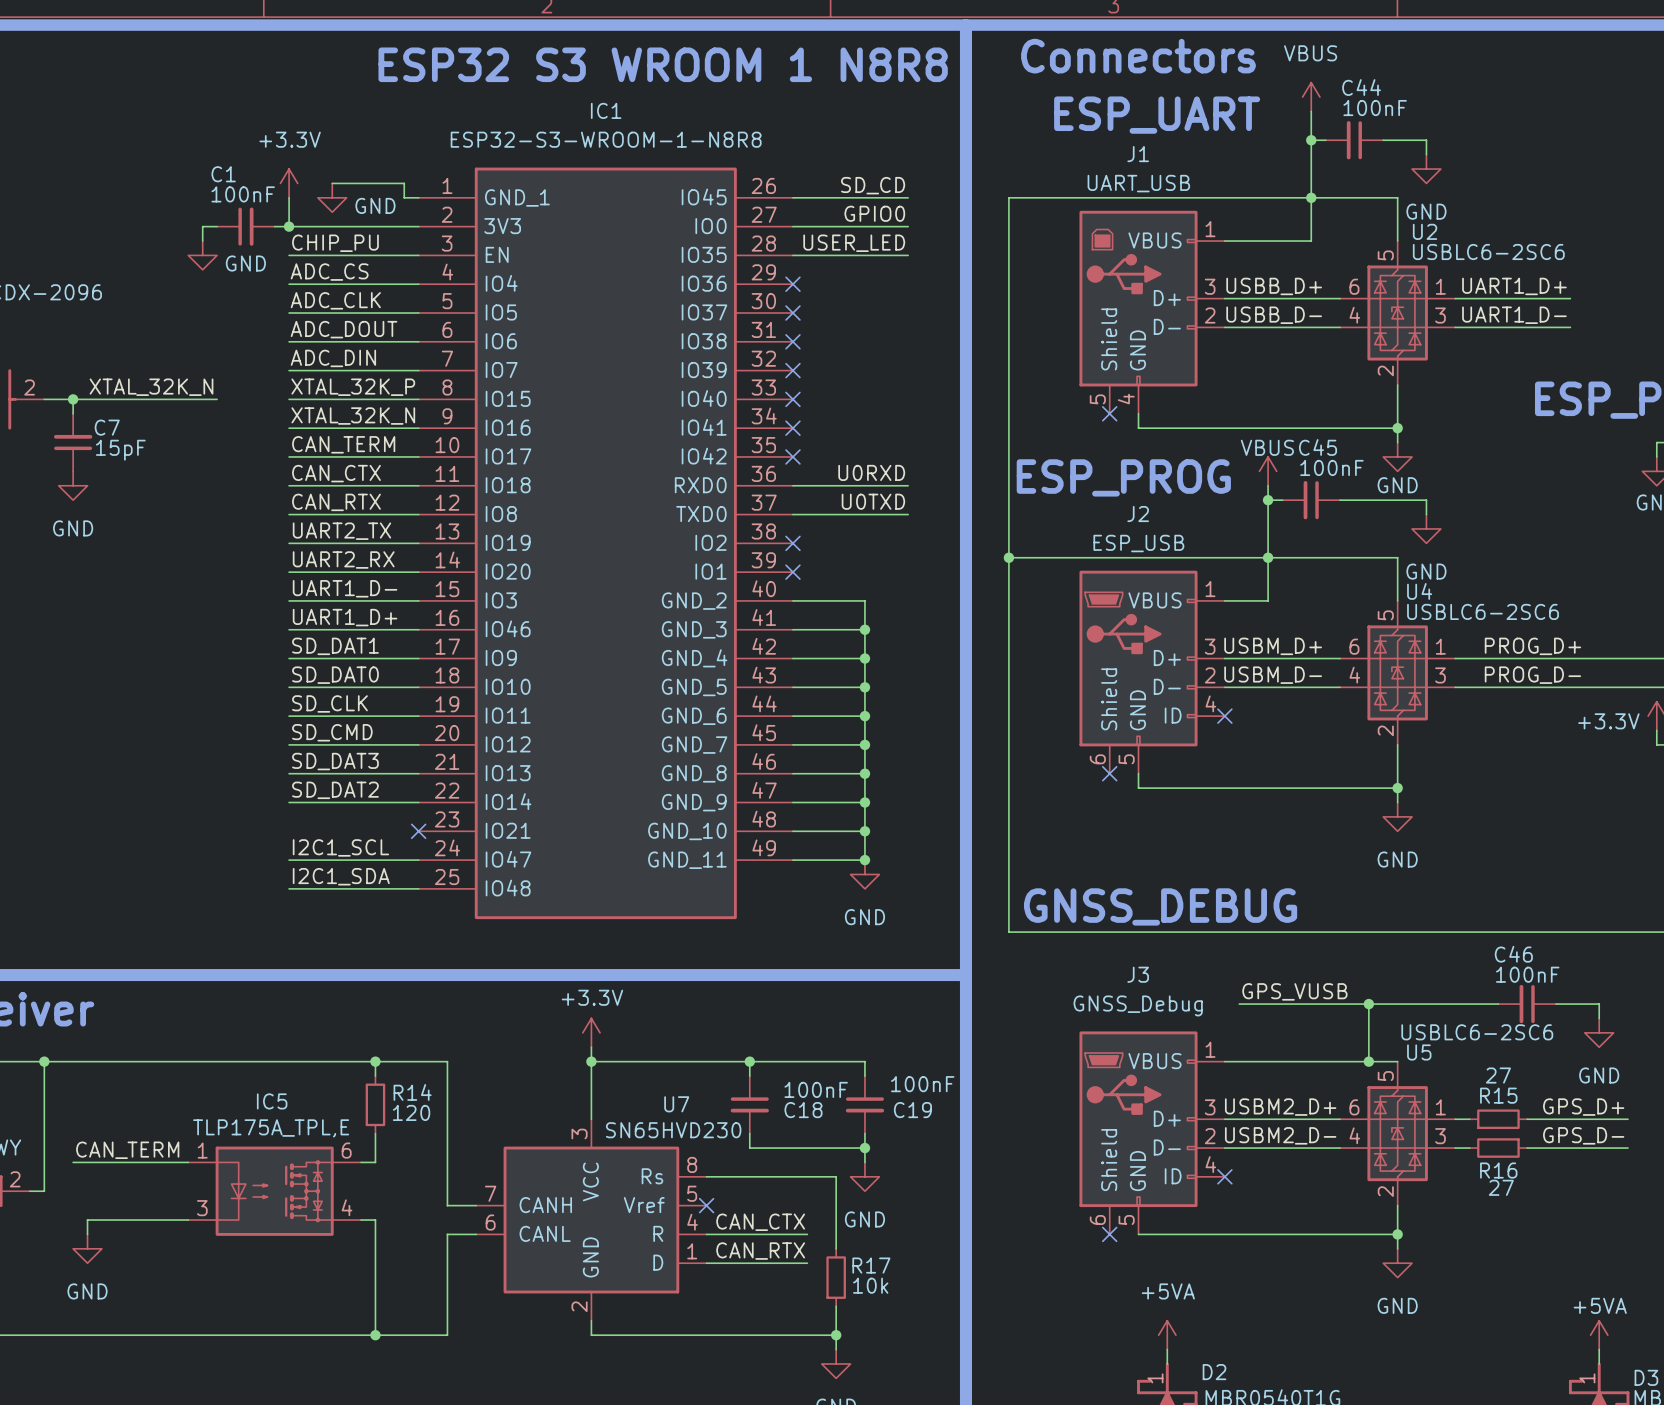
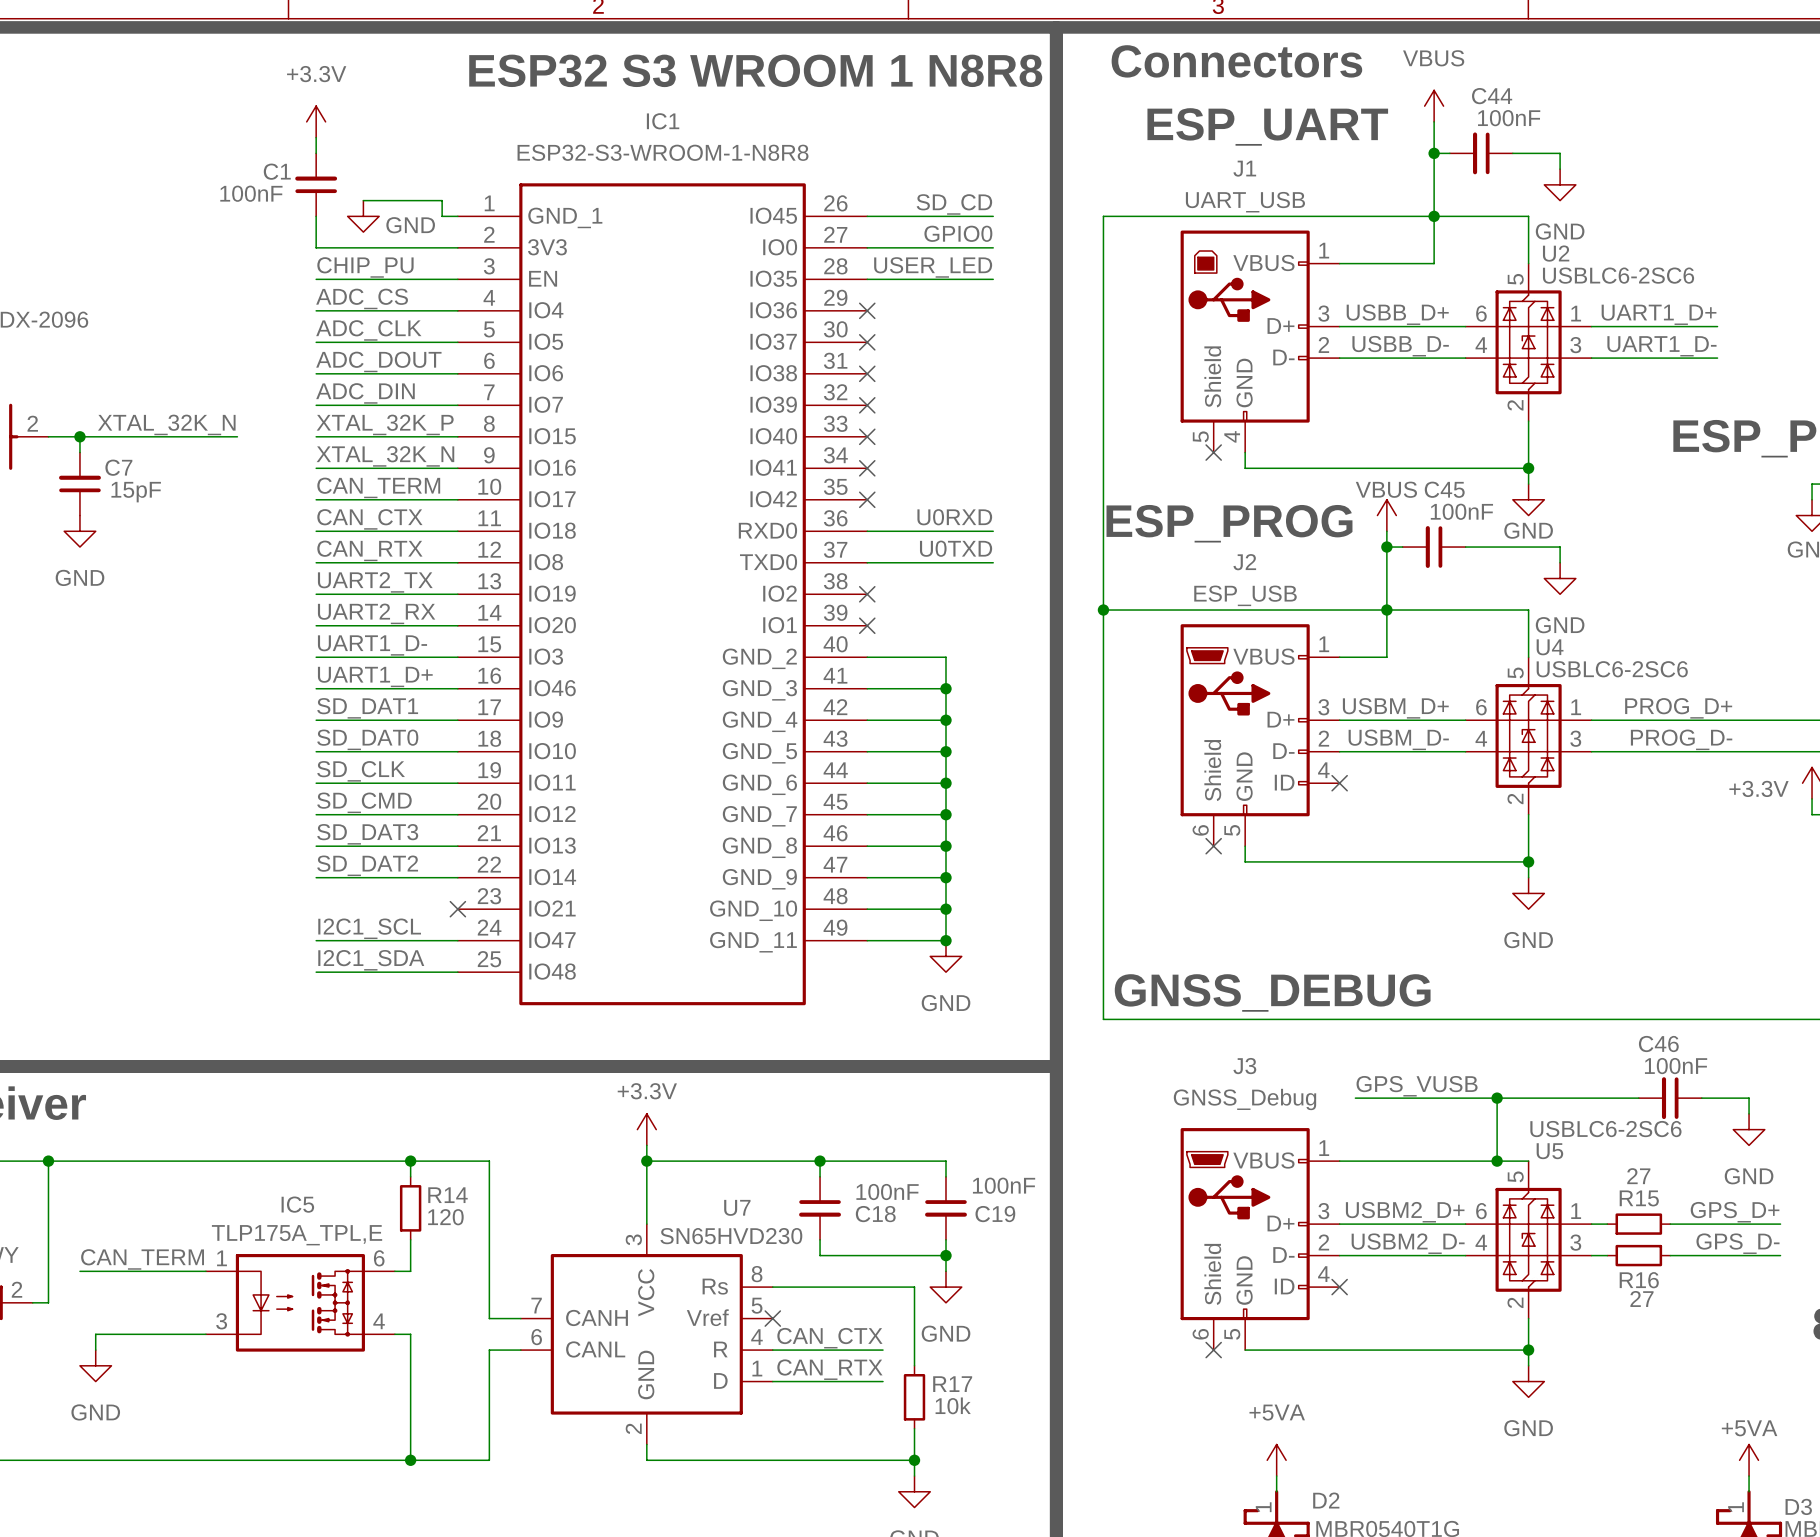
wire: none -> (316, 137) (316, 153)
C1 name position: C1 (223, 174) -> C1 (277, 171)
power symbol position: +3.3V (289, 183) -> +3.3V (316, 121)
wire: (217, 226) (202, 226) (202, 241) -> none
C1 rotation: 0° (245, 226) -> 90° counterclockwise (316, 184)
C1 position: (245, 226) -> (316, 184)
wire: (274, 226) (289, 226) -> none
junction: (289, 226) -> none
power symbol: GND (202, 255) -> none

